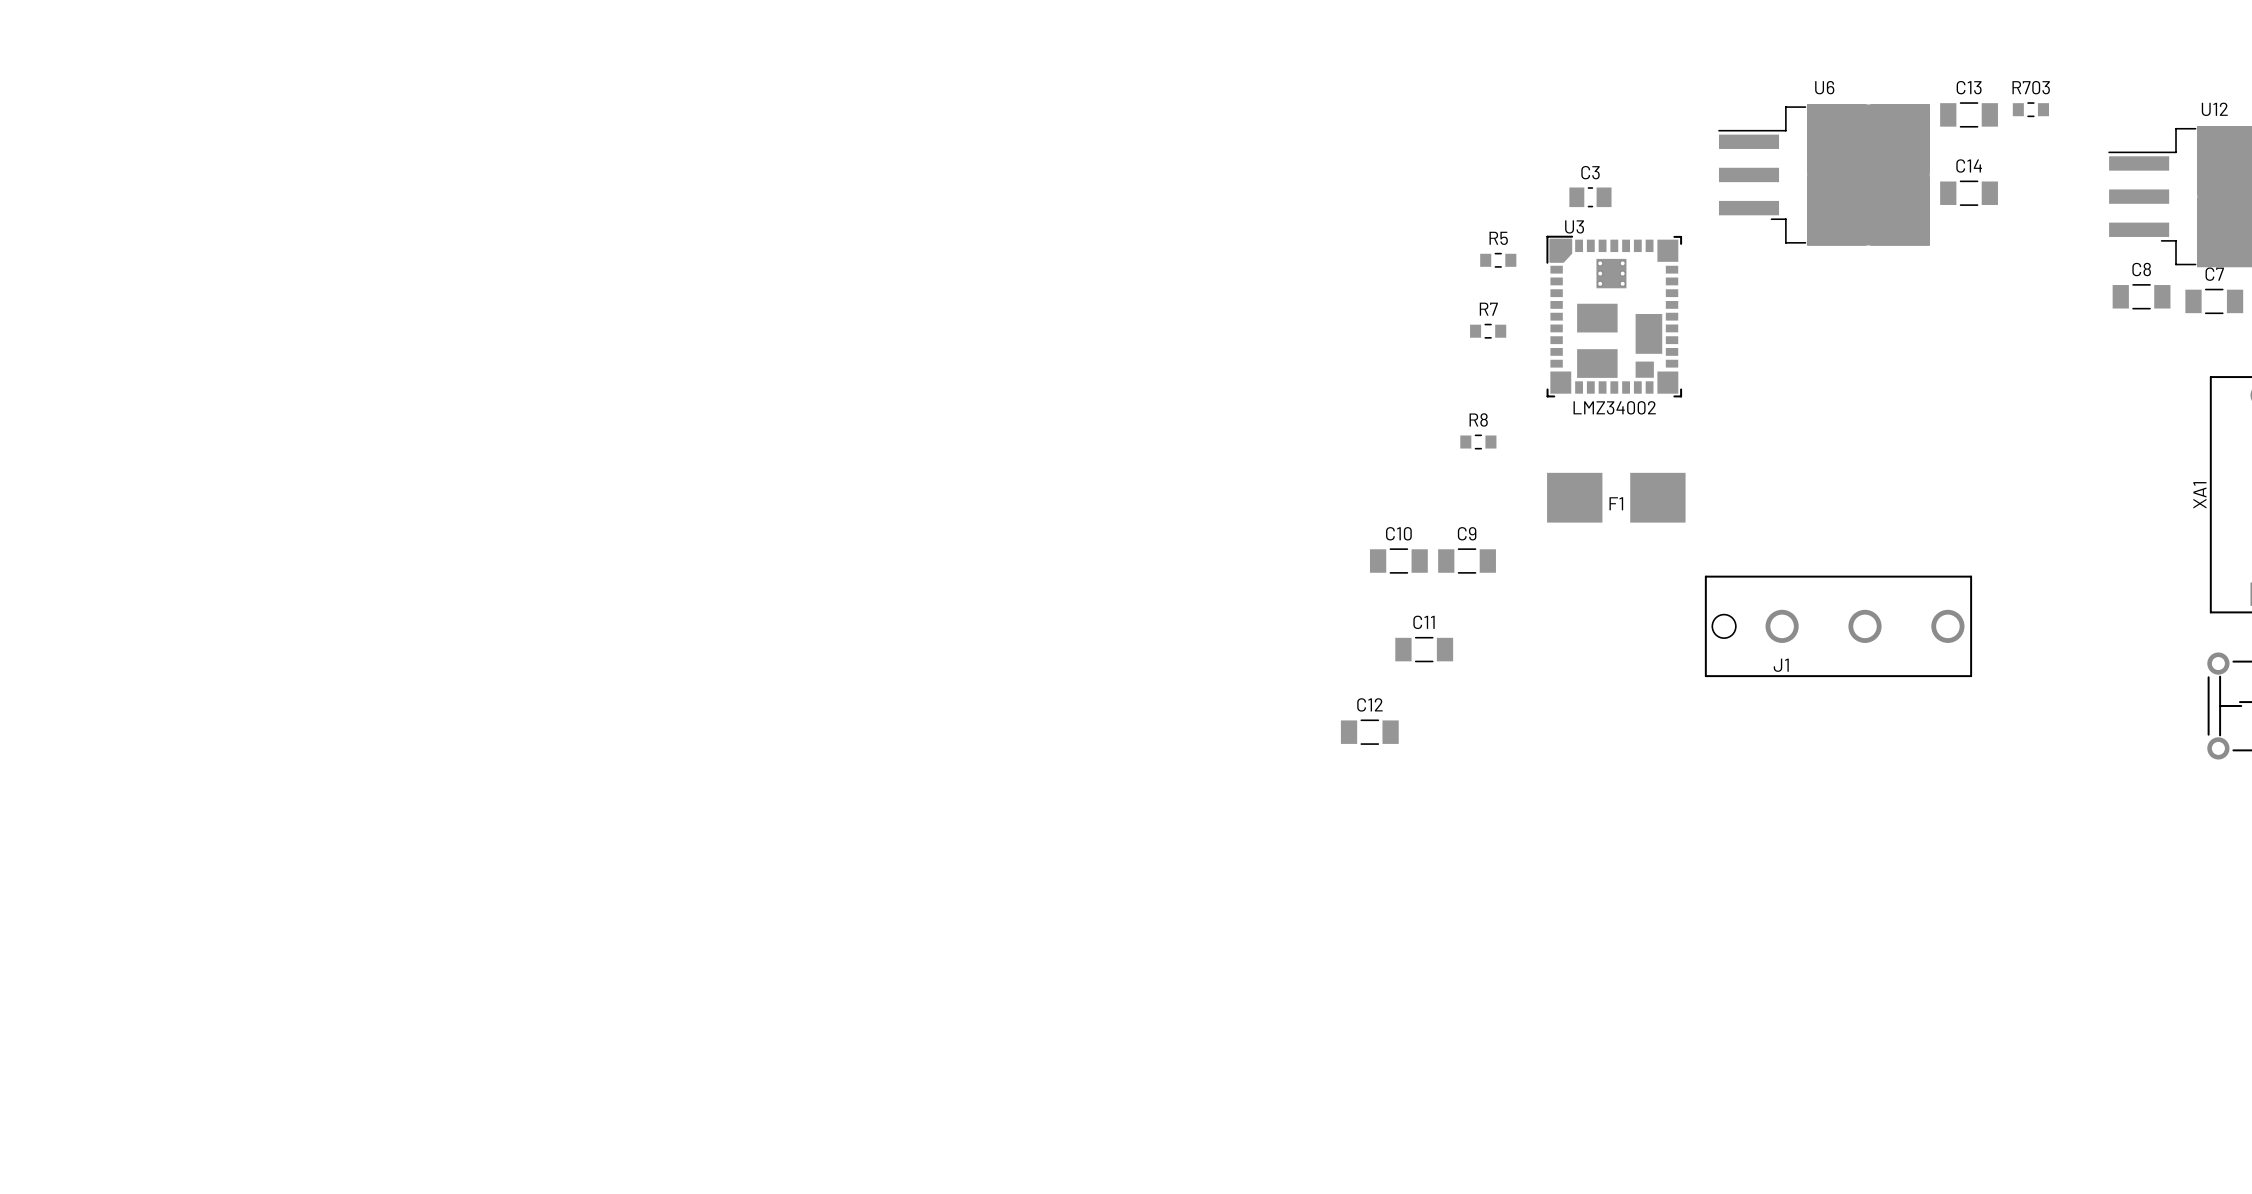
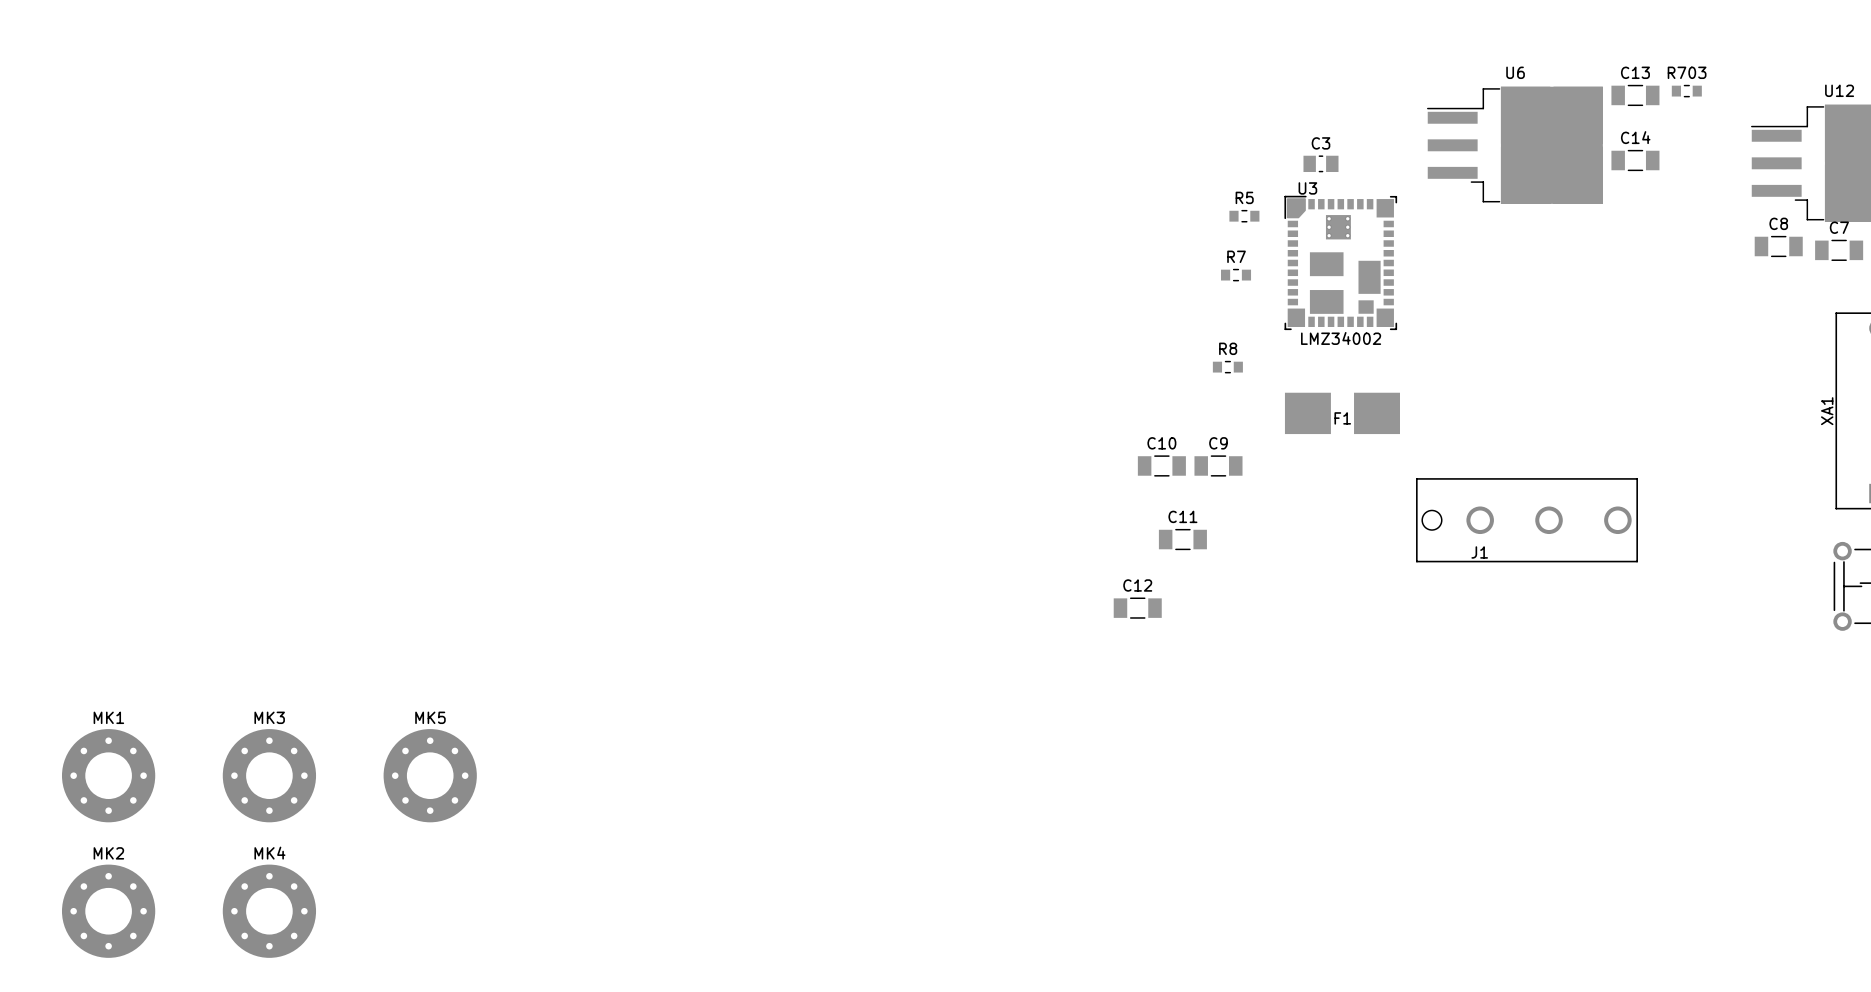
MK1: none -> (108, 775)
MK3: none -> (269, 775)
MK5: none -> (430, 775)
MK2: none -> (108, 911)
MK4: none -> (269, 911)

